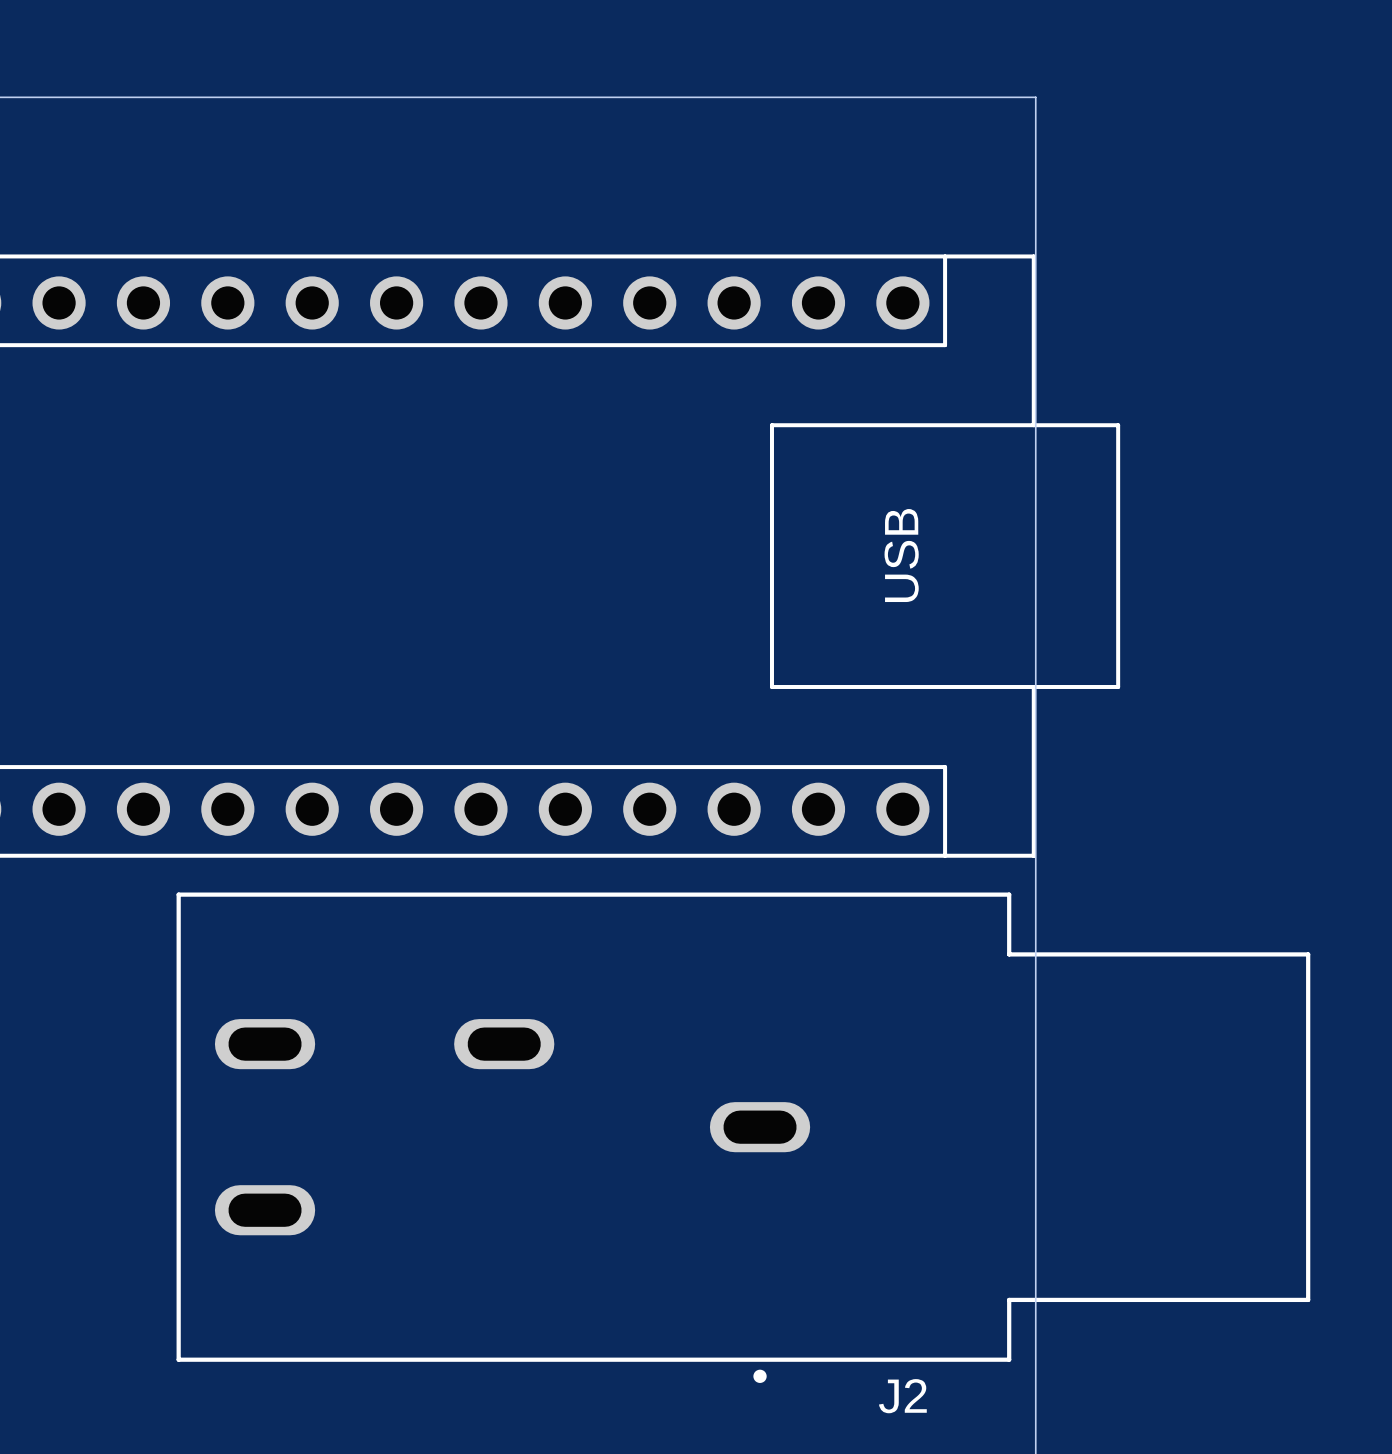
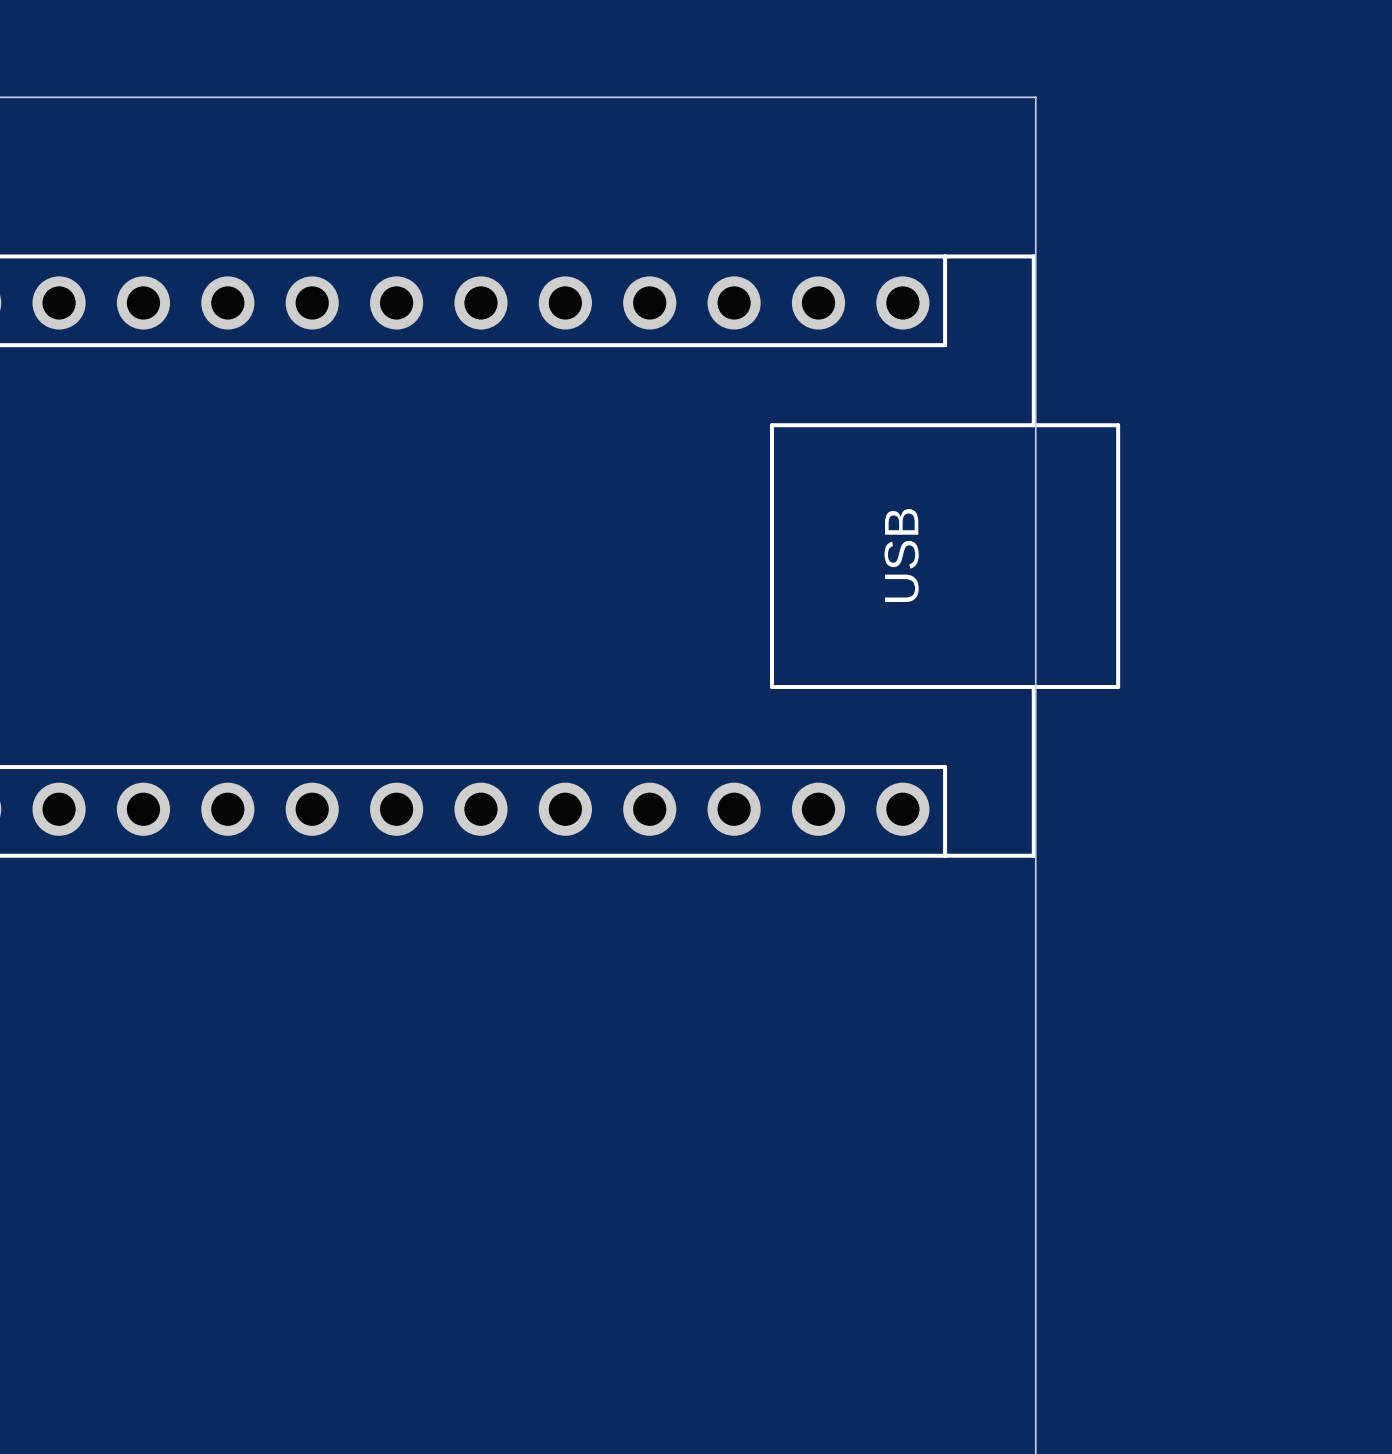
J2: (743, 1137) -> none

